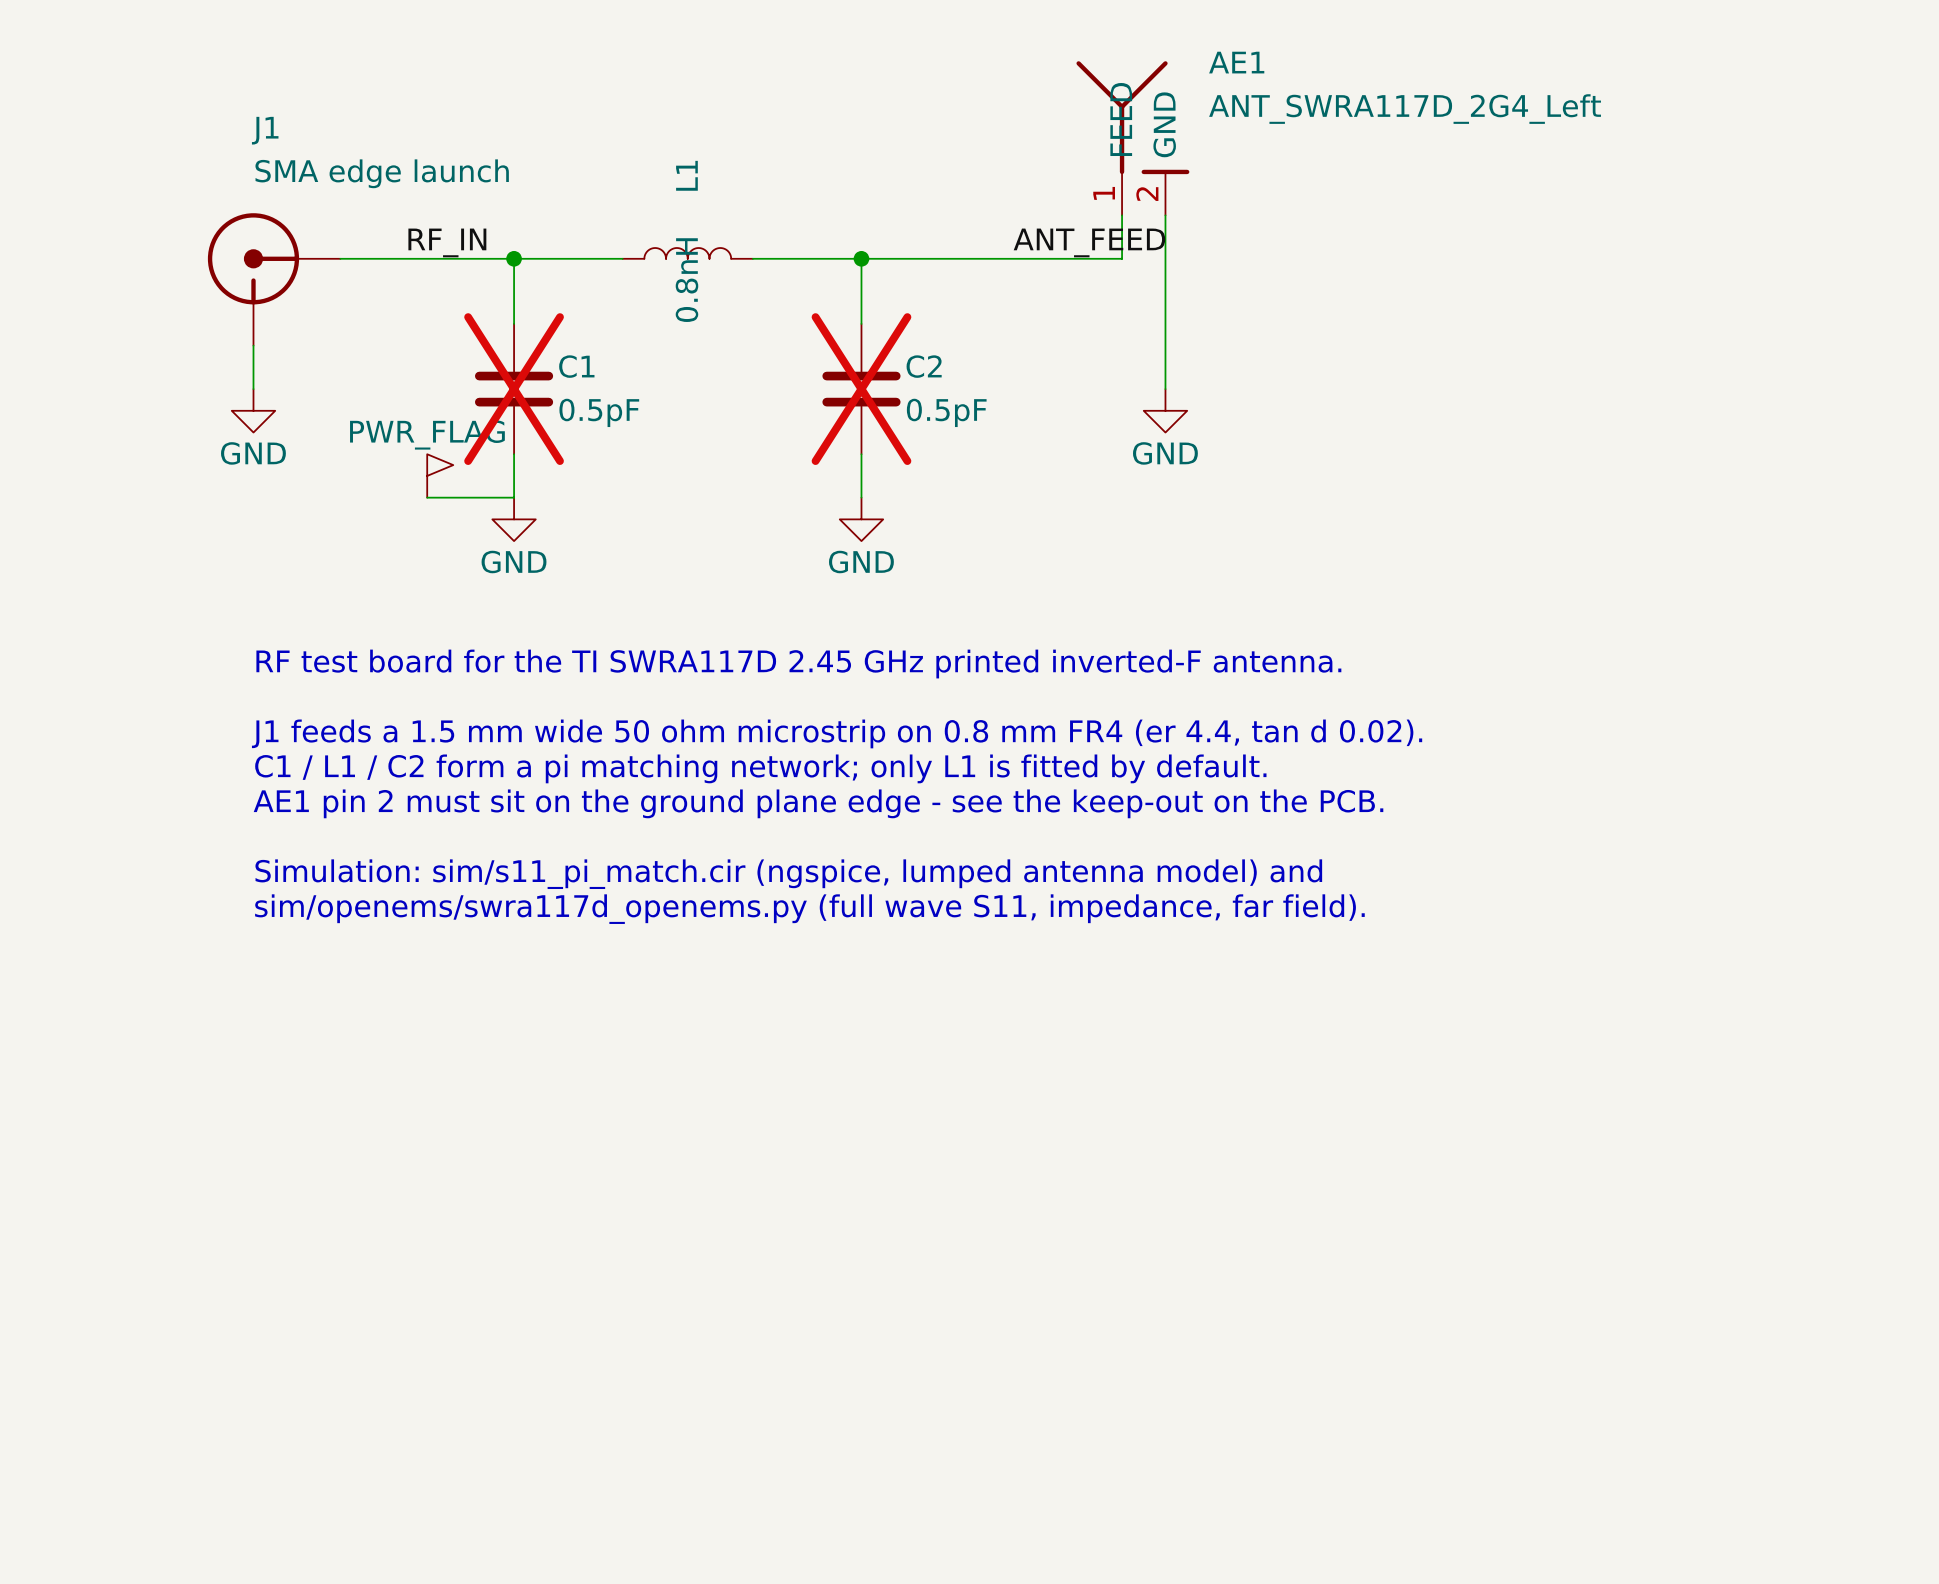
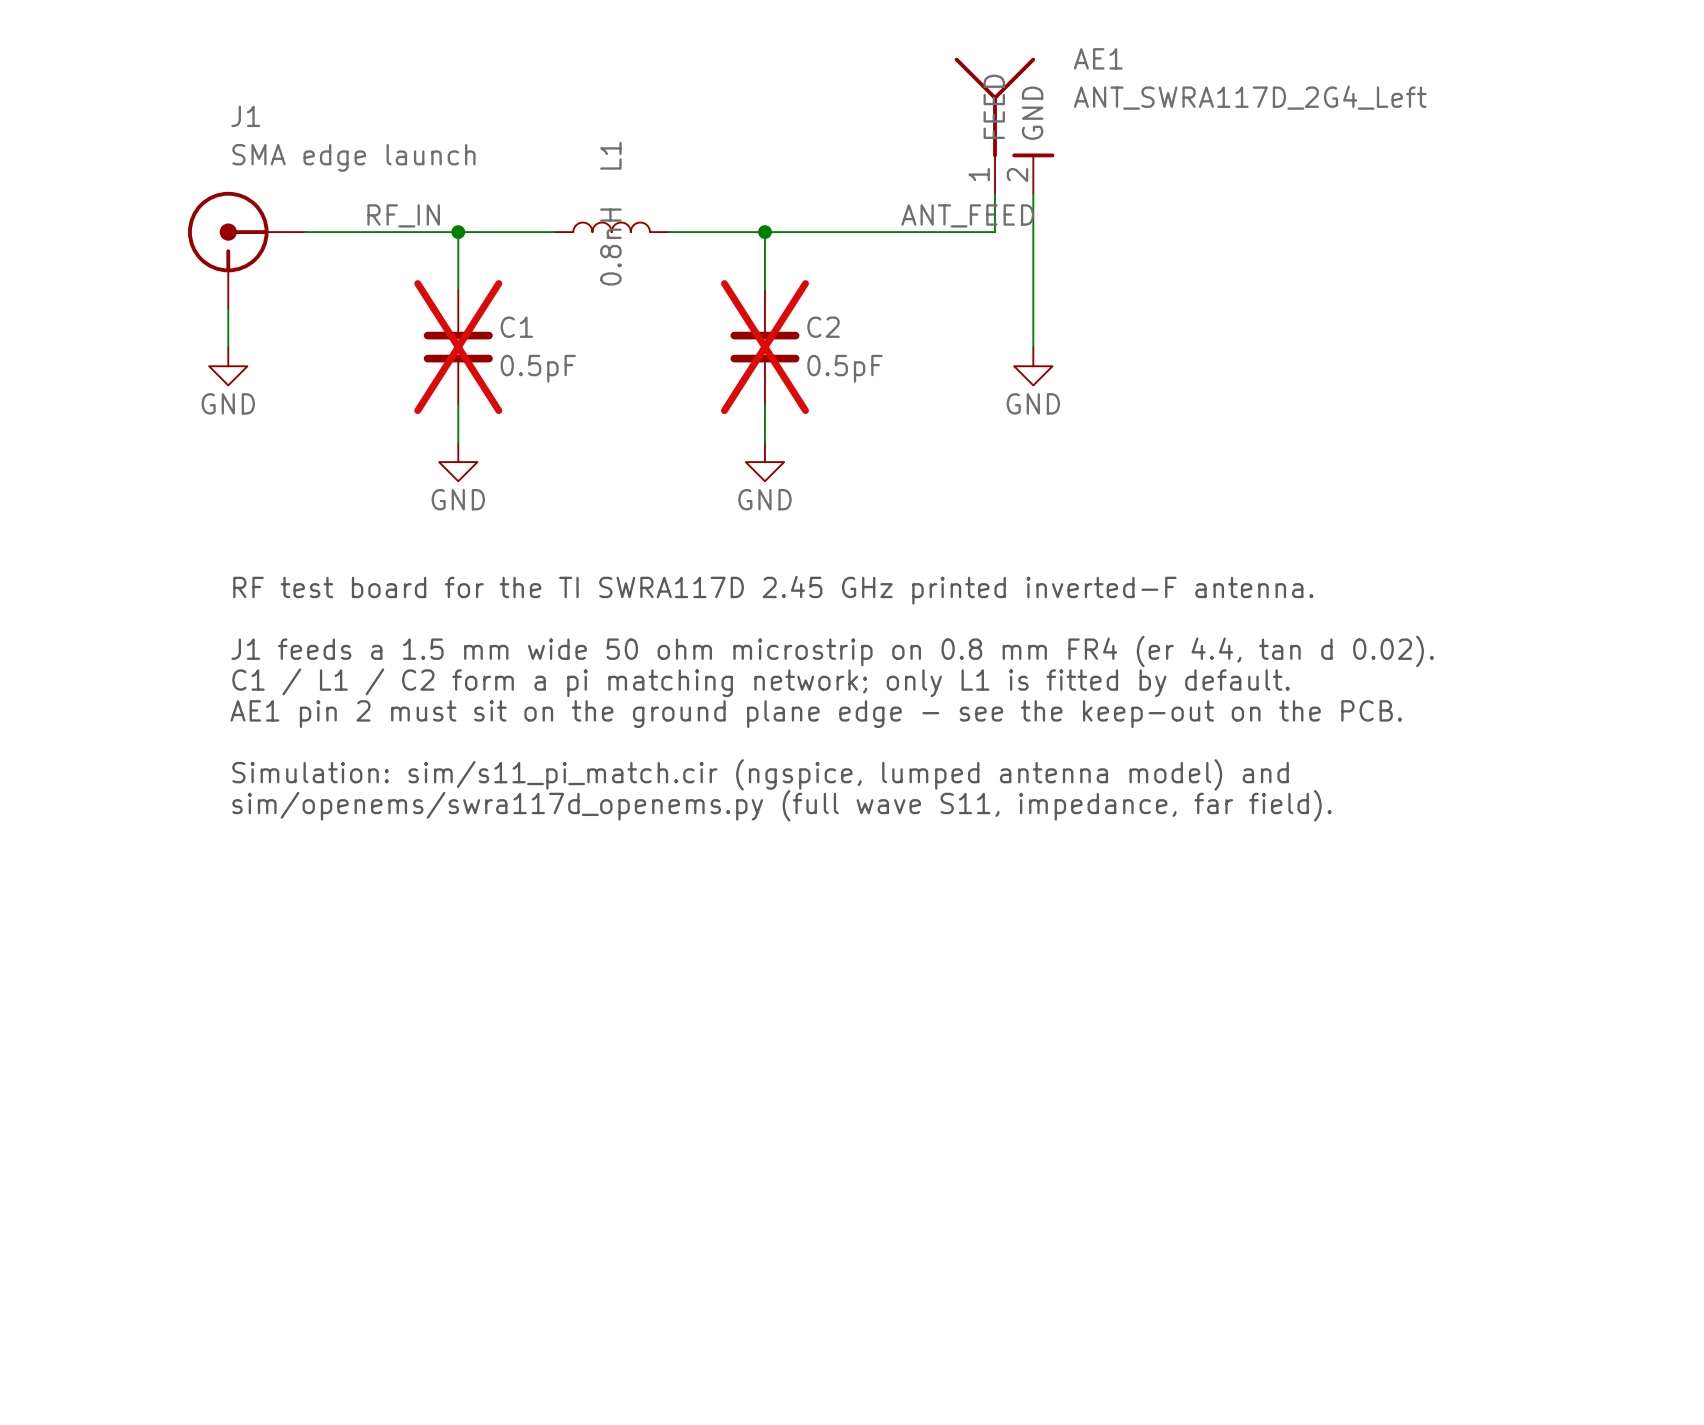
power symbol: PWR_FLAG (440, 475) -> none
wire: (427, 497) (514, 497) -> none

